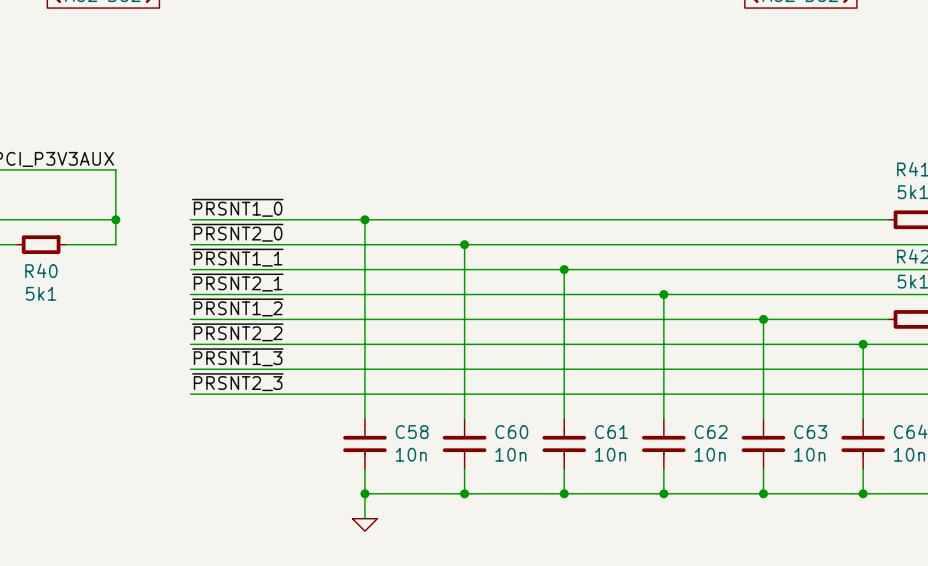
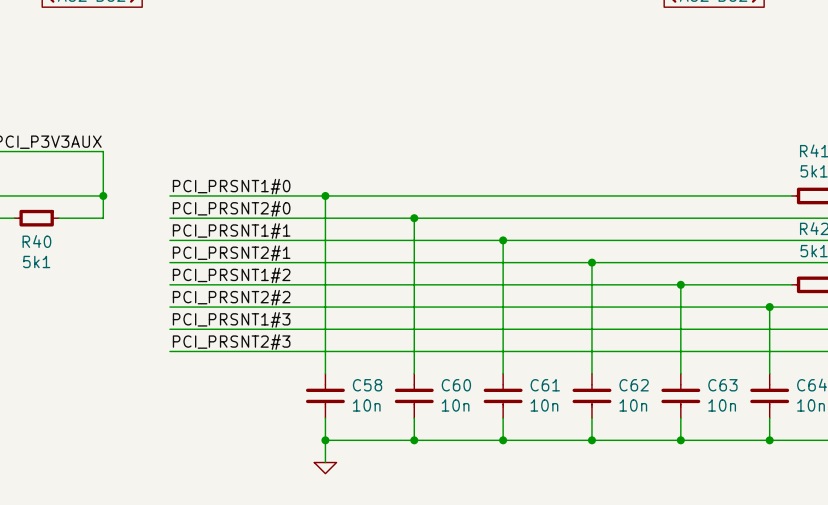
label: ~{PRSNT1_0} (237, 207) -> PCI_PRSNT1#0 (231, 186)
label: ~{PRSNT2_0} (237, 232) -> PCI_PRSNT2#0 (231, 208)
label: ~{PRSNT1_1} (237, 257) -> PCI_PRSNT1#1 (231, 231)
label: ~{PRSNT2_1} (237, 282) -> PCI_PRSNT2#1 (231, 253)
label: ~{PRSNT1_2} (237, 307) -> PCI_PRSNT1#2 (231, 275)
label: ~{PRSNT2_2} (237, 332) -> PCI_PRSNT2#2 (231, 297)
label: ~{PRSNT1_3} (237, 357) -> PCI_PRSNT1#3 (231, 319)
label: ~{PRSNT2_3} (237, 382) -> PCI_PRSNT2#3 (231, 342)

